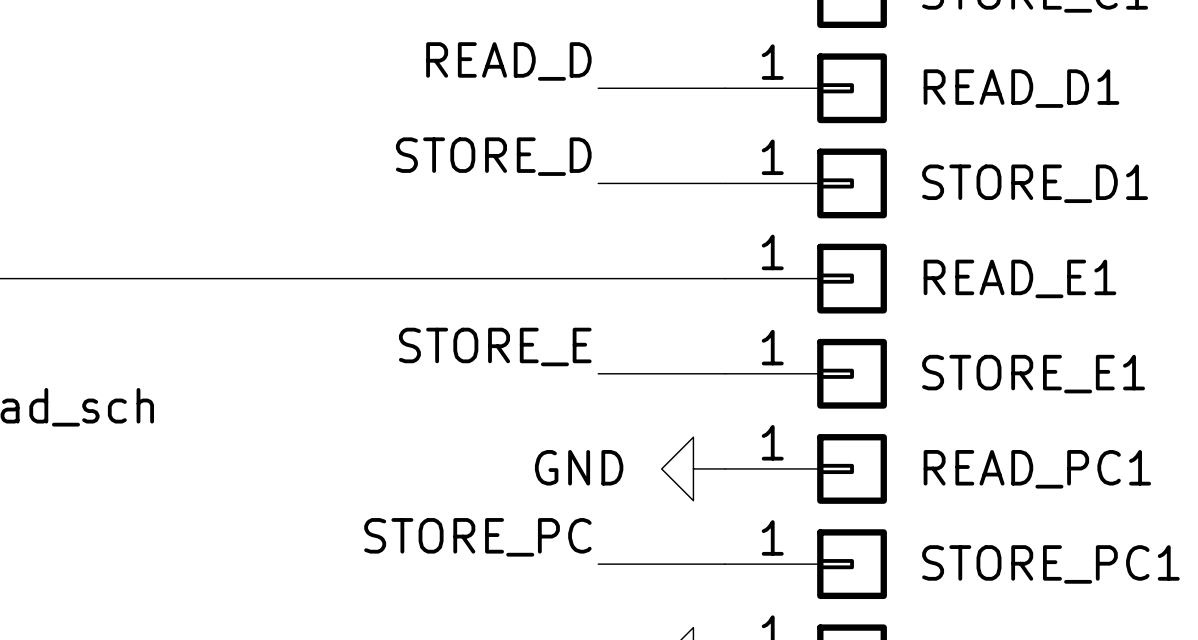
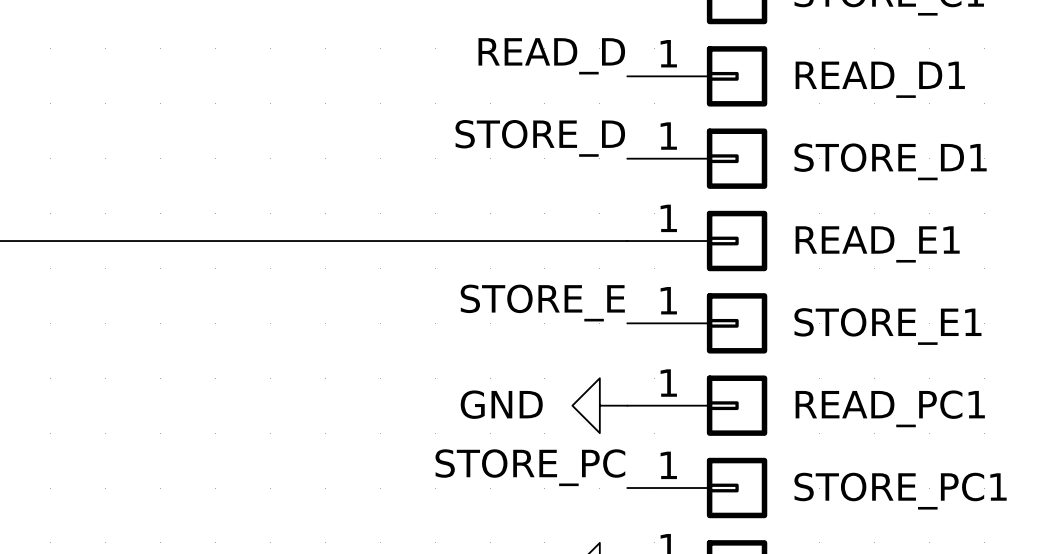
label position: READ_D (508, 61) -> READ_D (551, 56)
wire: (598, 88) (725, 88) -> none
label position: STORE_D (493, 156) -> STORE_D (540, 138)
wire: (598, 183) (725, 183) -> none
label position: STORE_E (495, 346) -> STORE_E (542, 303)
wire: (598, 373) (725, 373) -> none
label position: STORE_PC (477, 537) -> STORE_PC (530, 467)
wire: (598, 564) (725, 564) -> none

